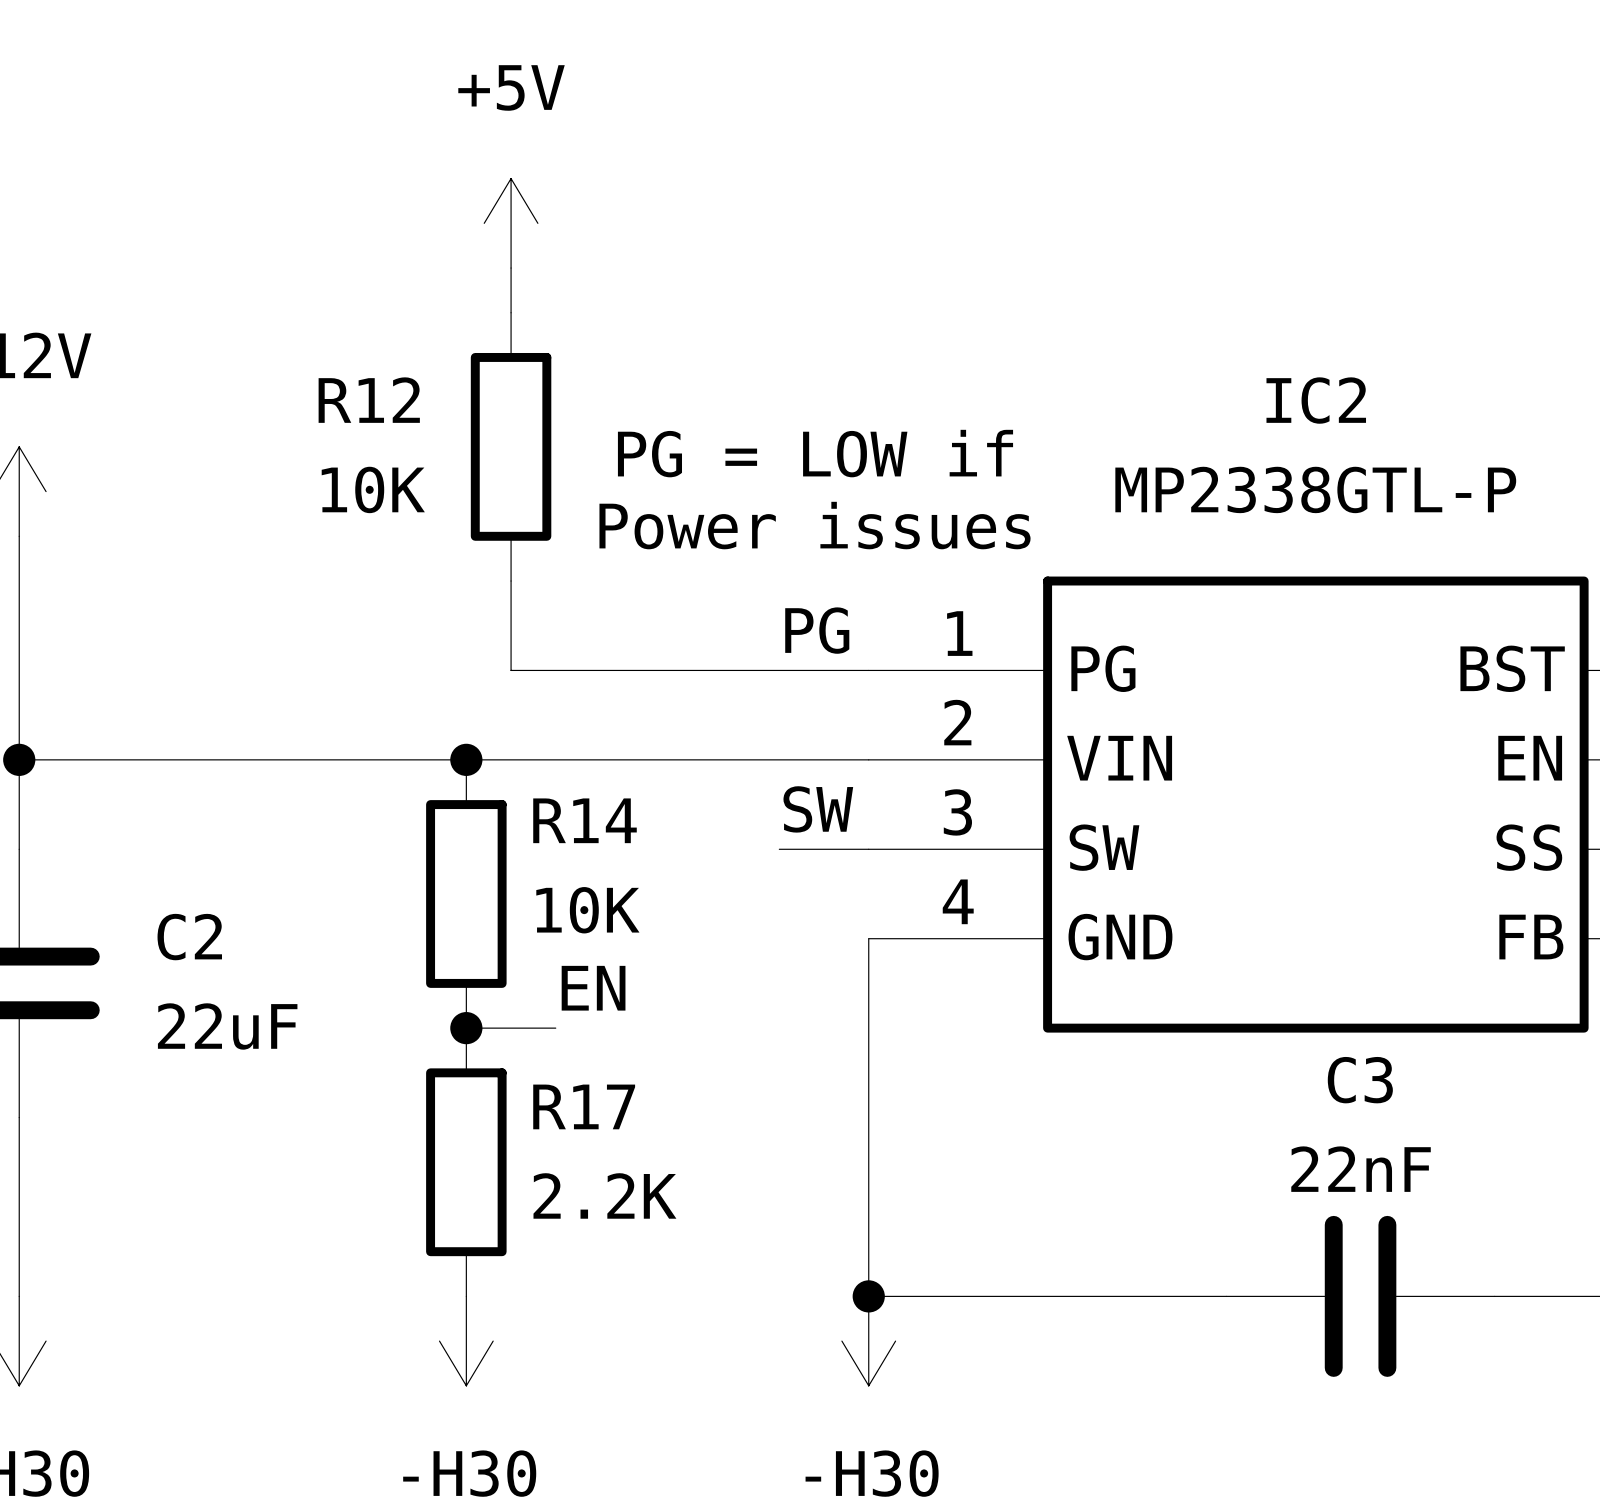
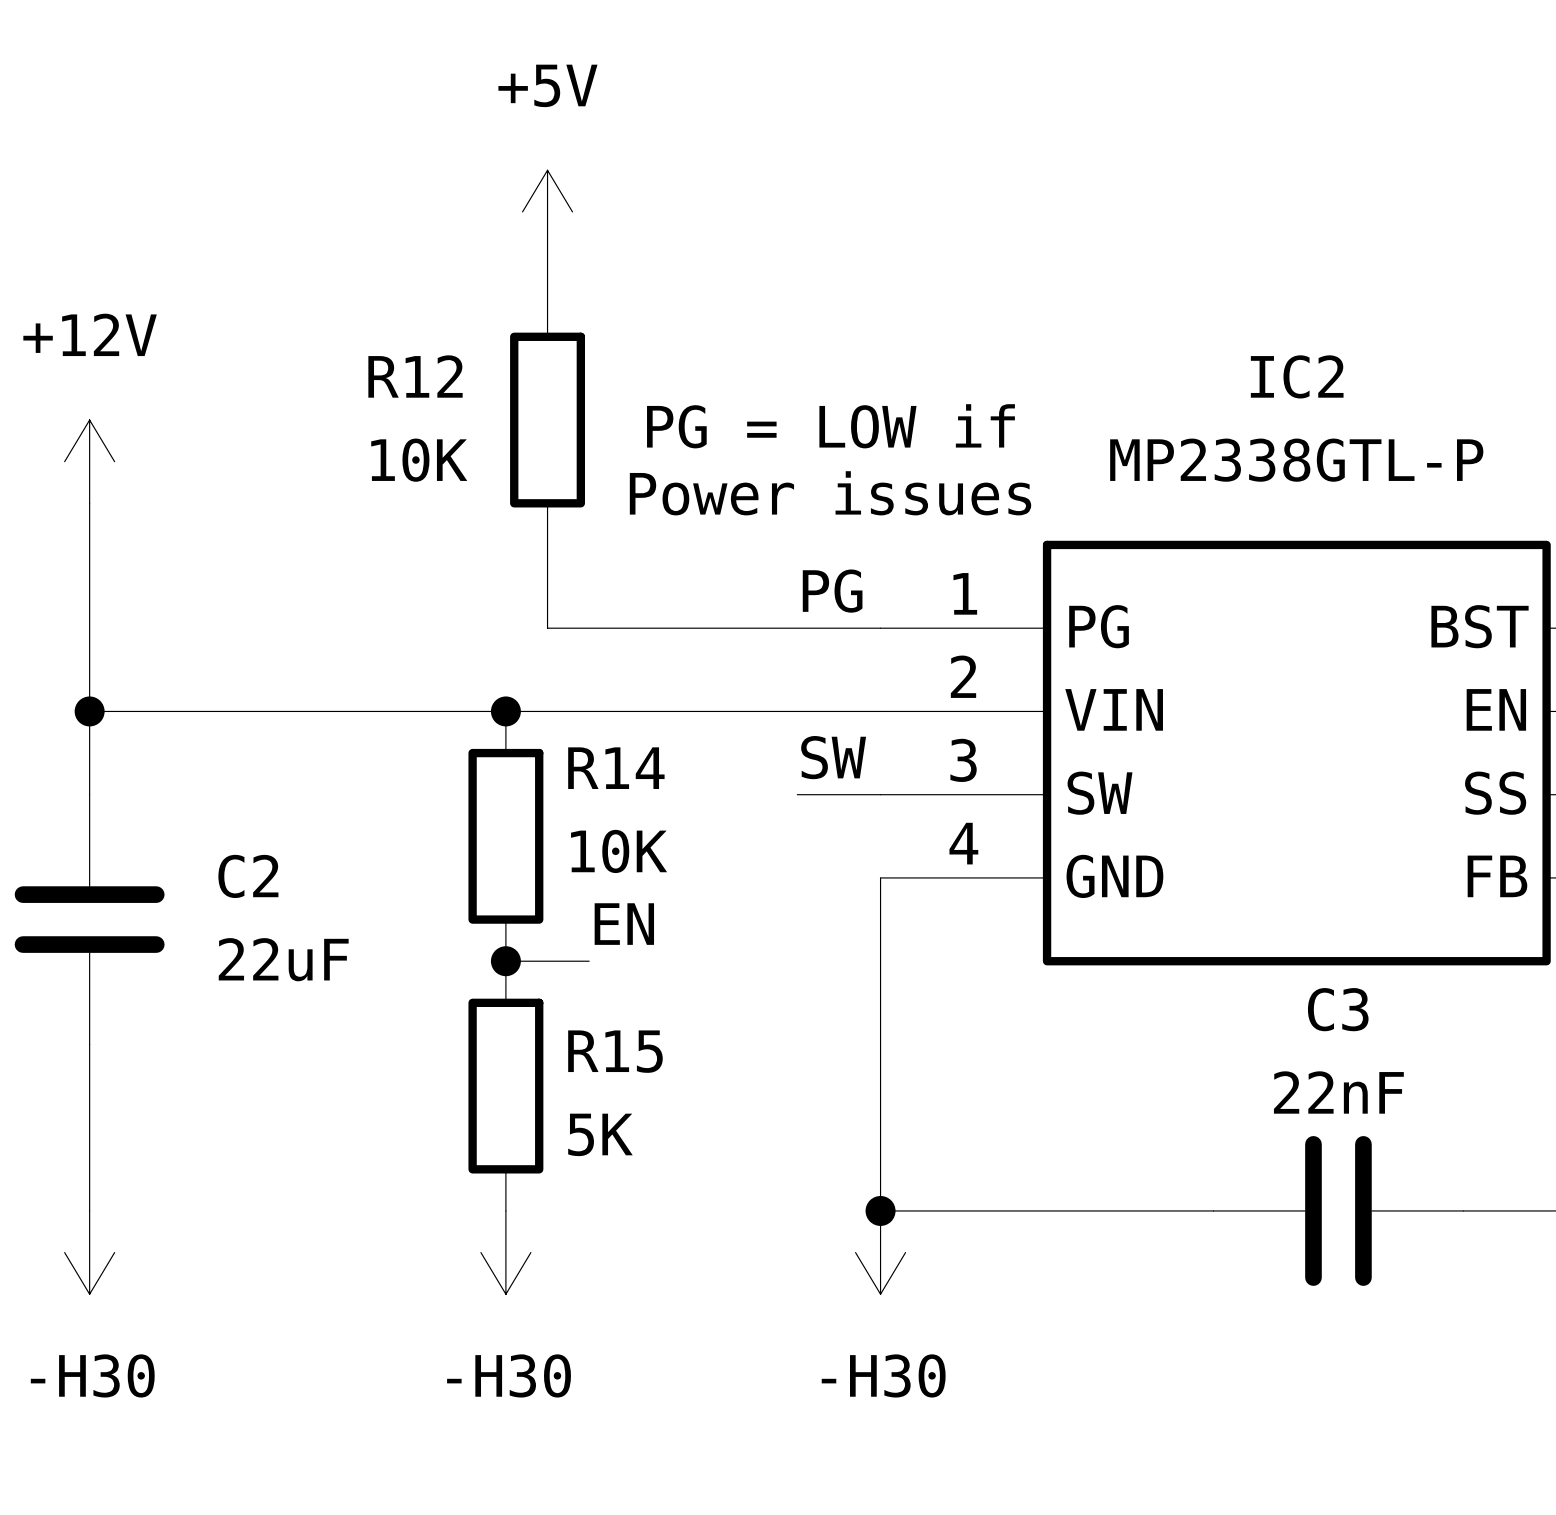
R17 name: R17 (584, 1106) -> R15 (615, 1051)
R17 value: 2.2K (604, 1195) -> 5K (600, 1134)

